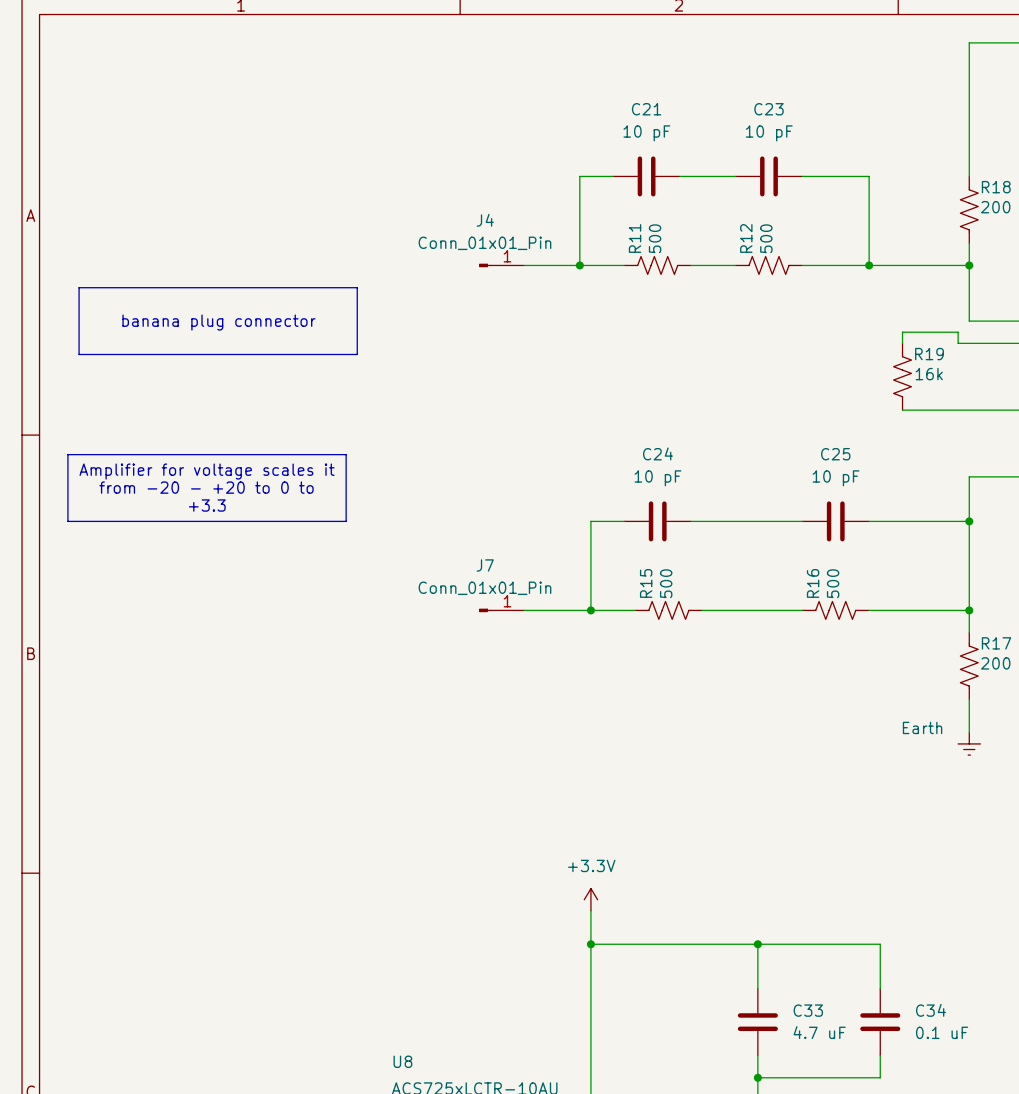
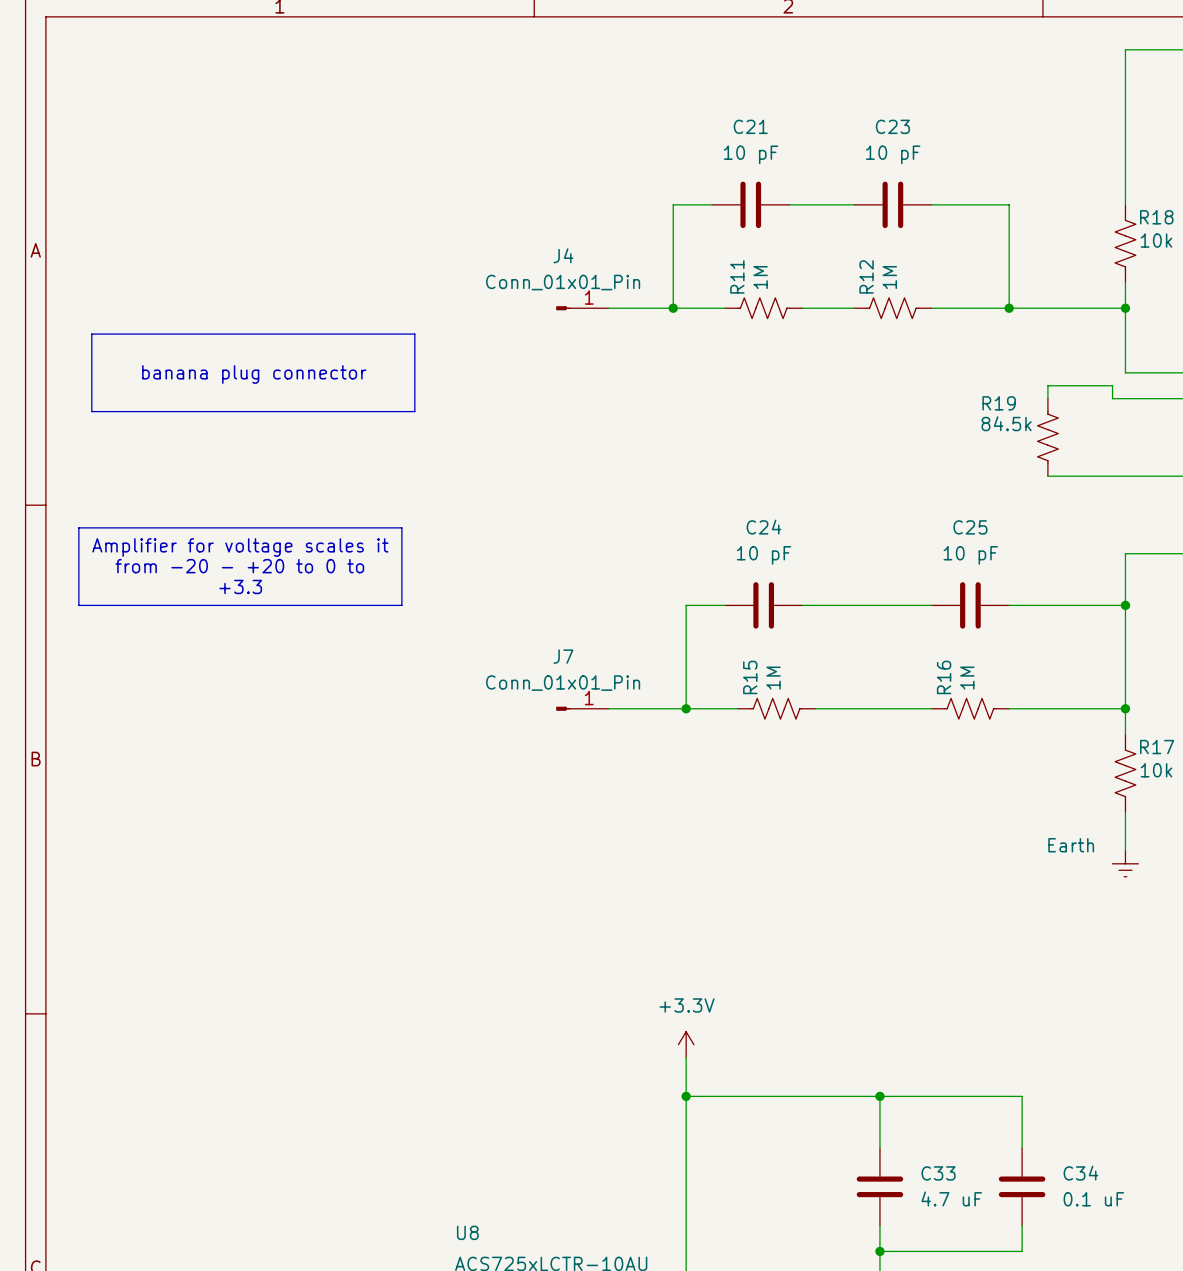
R18 value: 200 (995, 207) -> 10k (1156, 240)
R11 value: 500 (655, 238) -> 1M (760, 277)
R12 value: 500 (766, 238) -> 1M (889, 277)
R19 name position: R19 (929, 354) -> R19 (999, 403)
R19 value: 16k (929, 374) -> 84.5k (1006, 423)
R15 value: 500 (666, 583) -> 1M (773, 678)
R16 value: 500 (833, 583) -> 1M (967, 678)
R17 value: 200 (995, 663) -> 10k (1156, 770)

